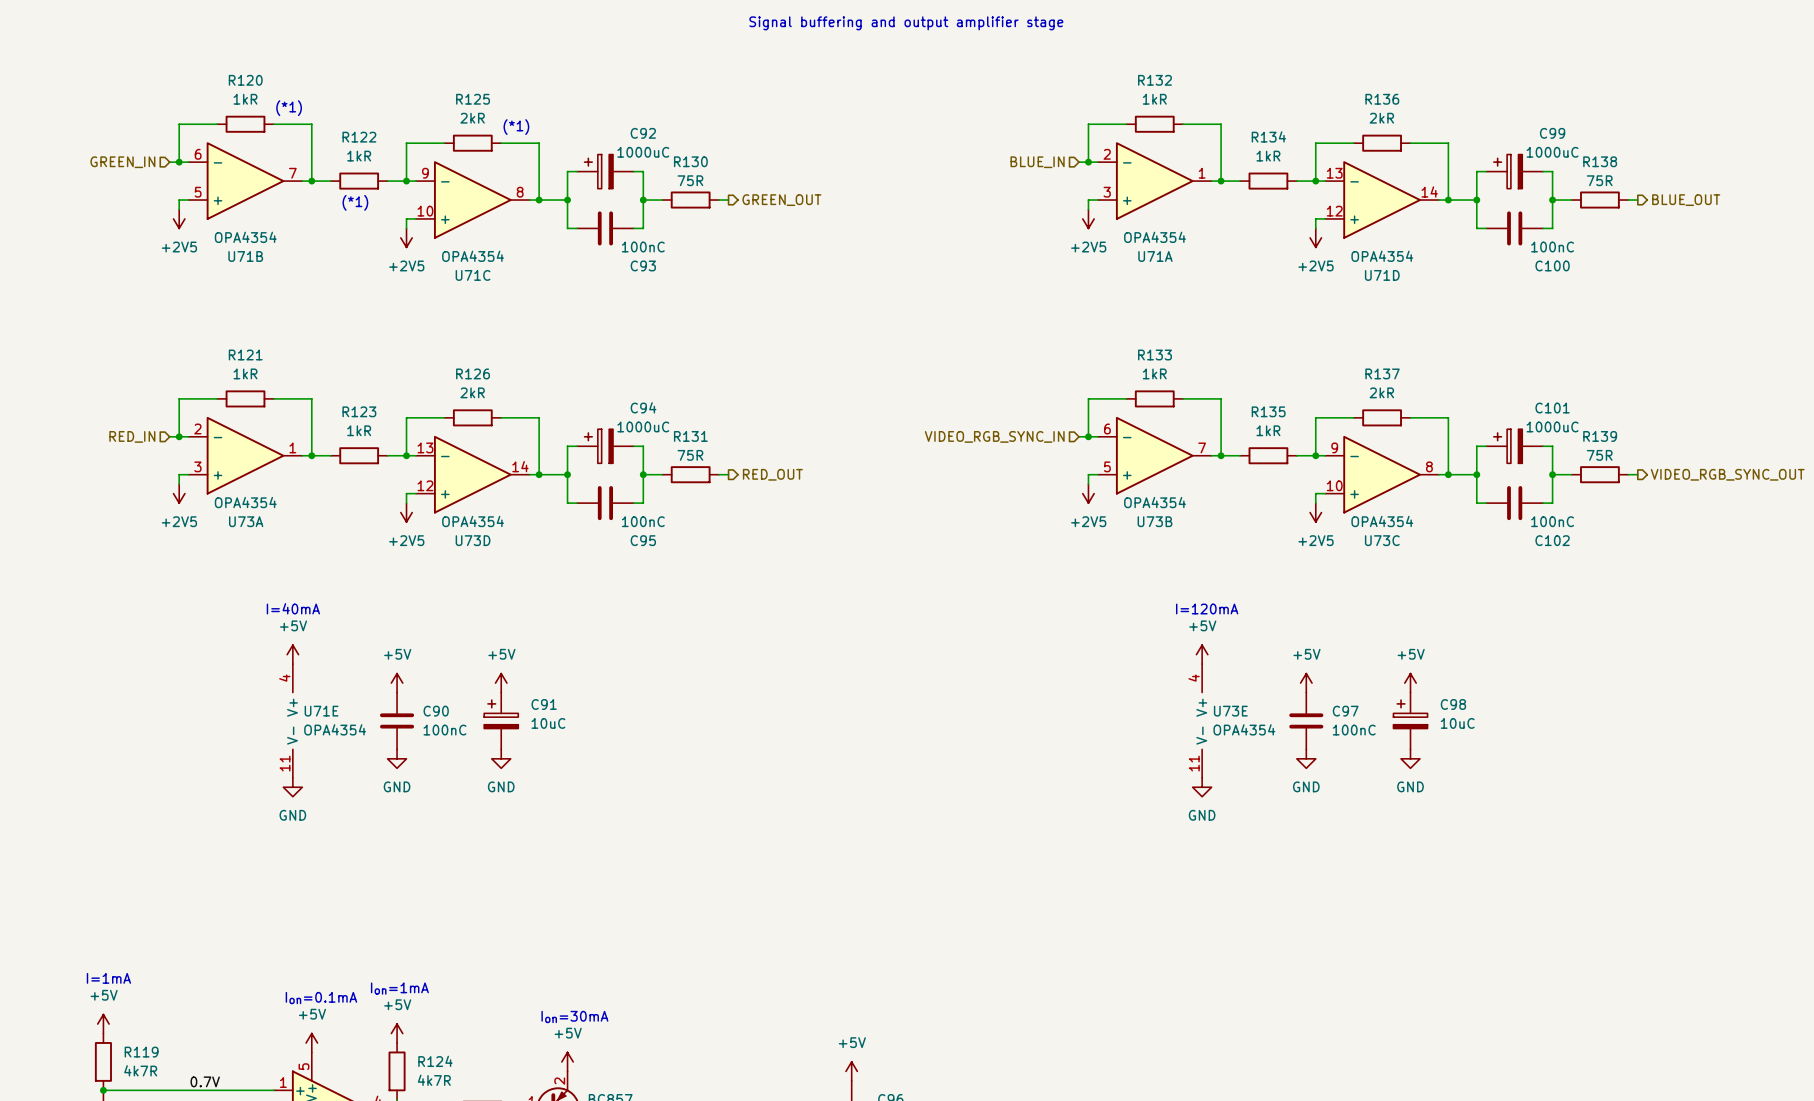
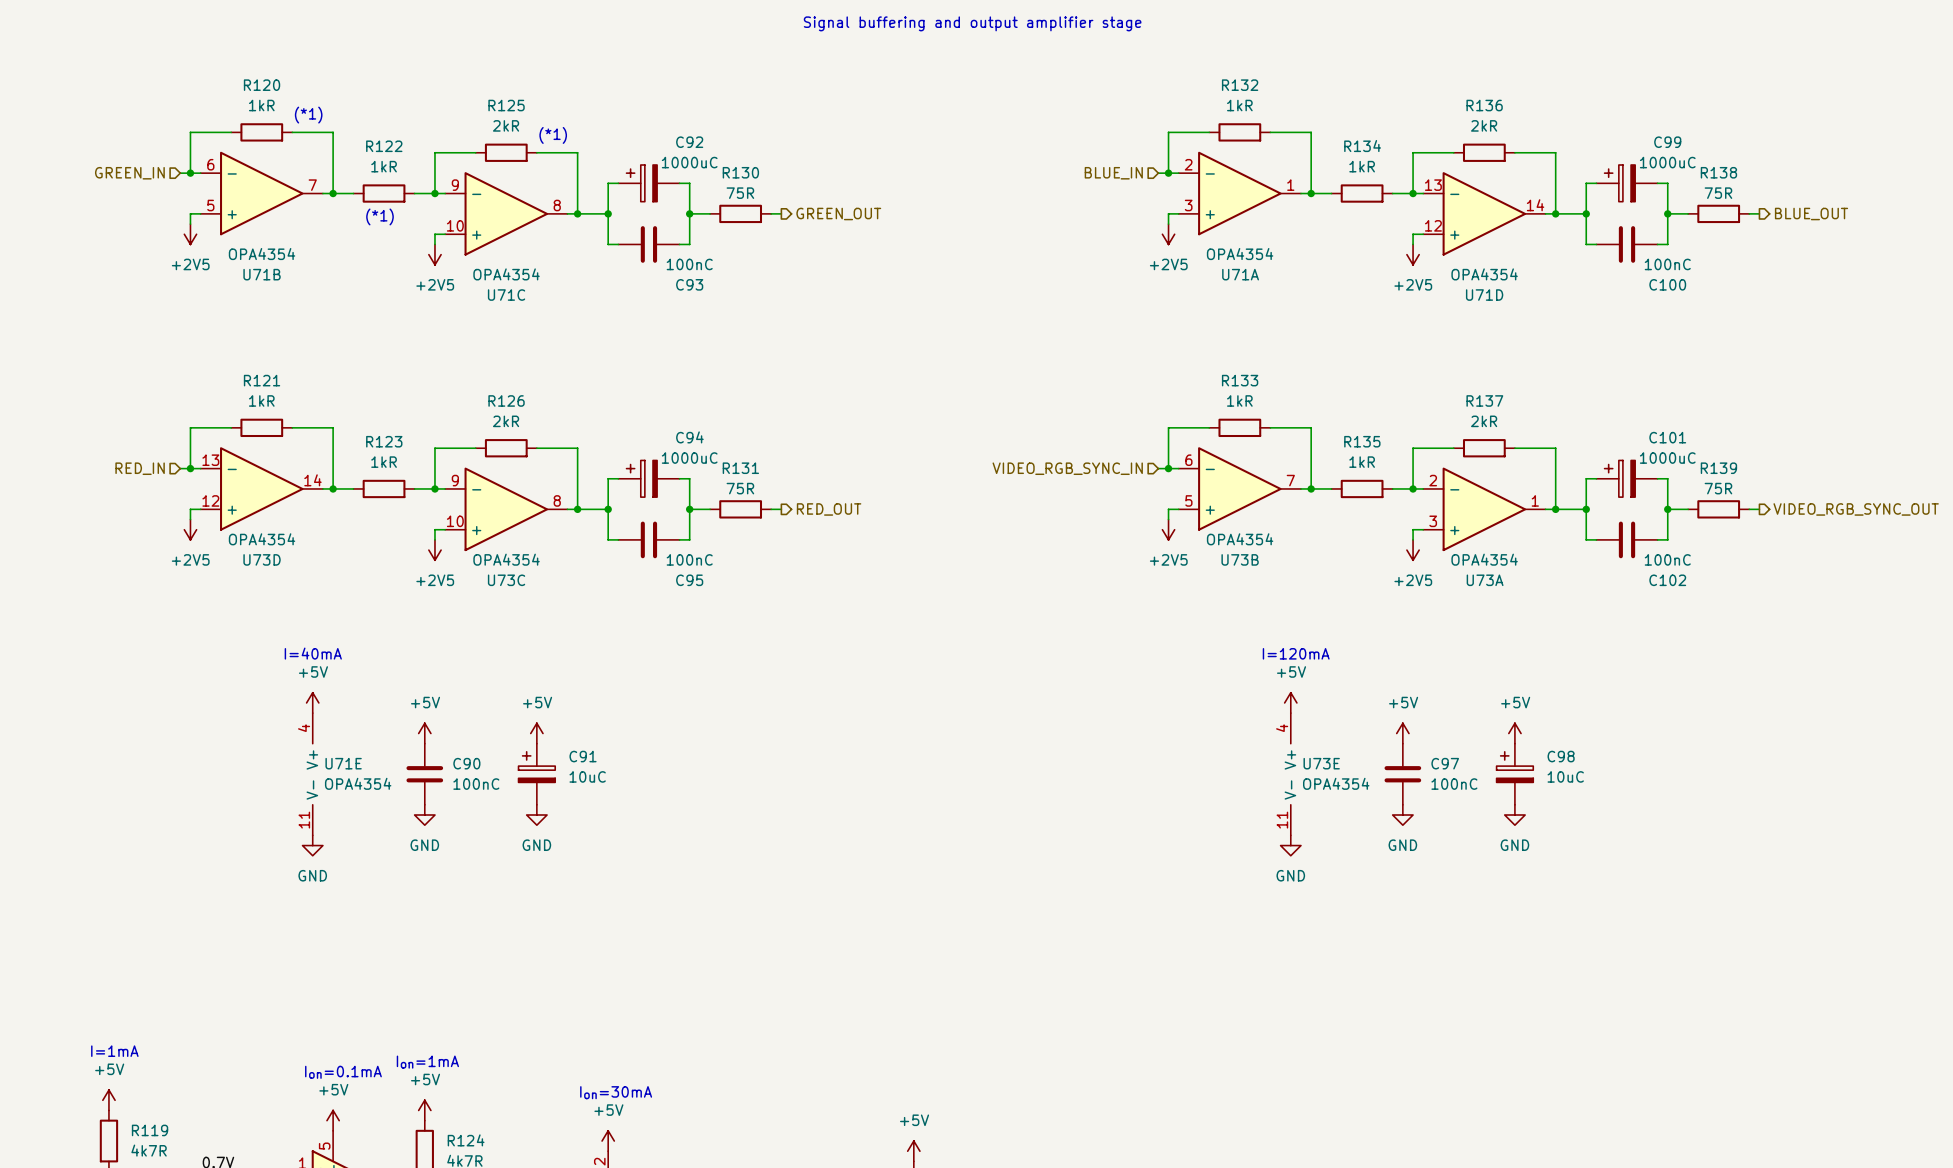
U73A position: (245, 455) -> (1484, 509)
U73D position: (472, 474) -> (261, 488)
U73C position: (1382, 474) -> (506, 509)

